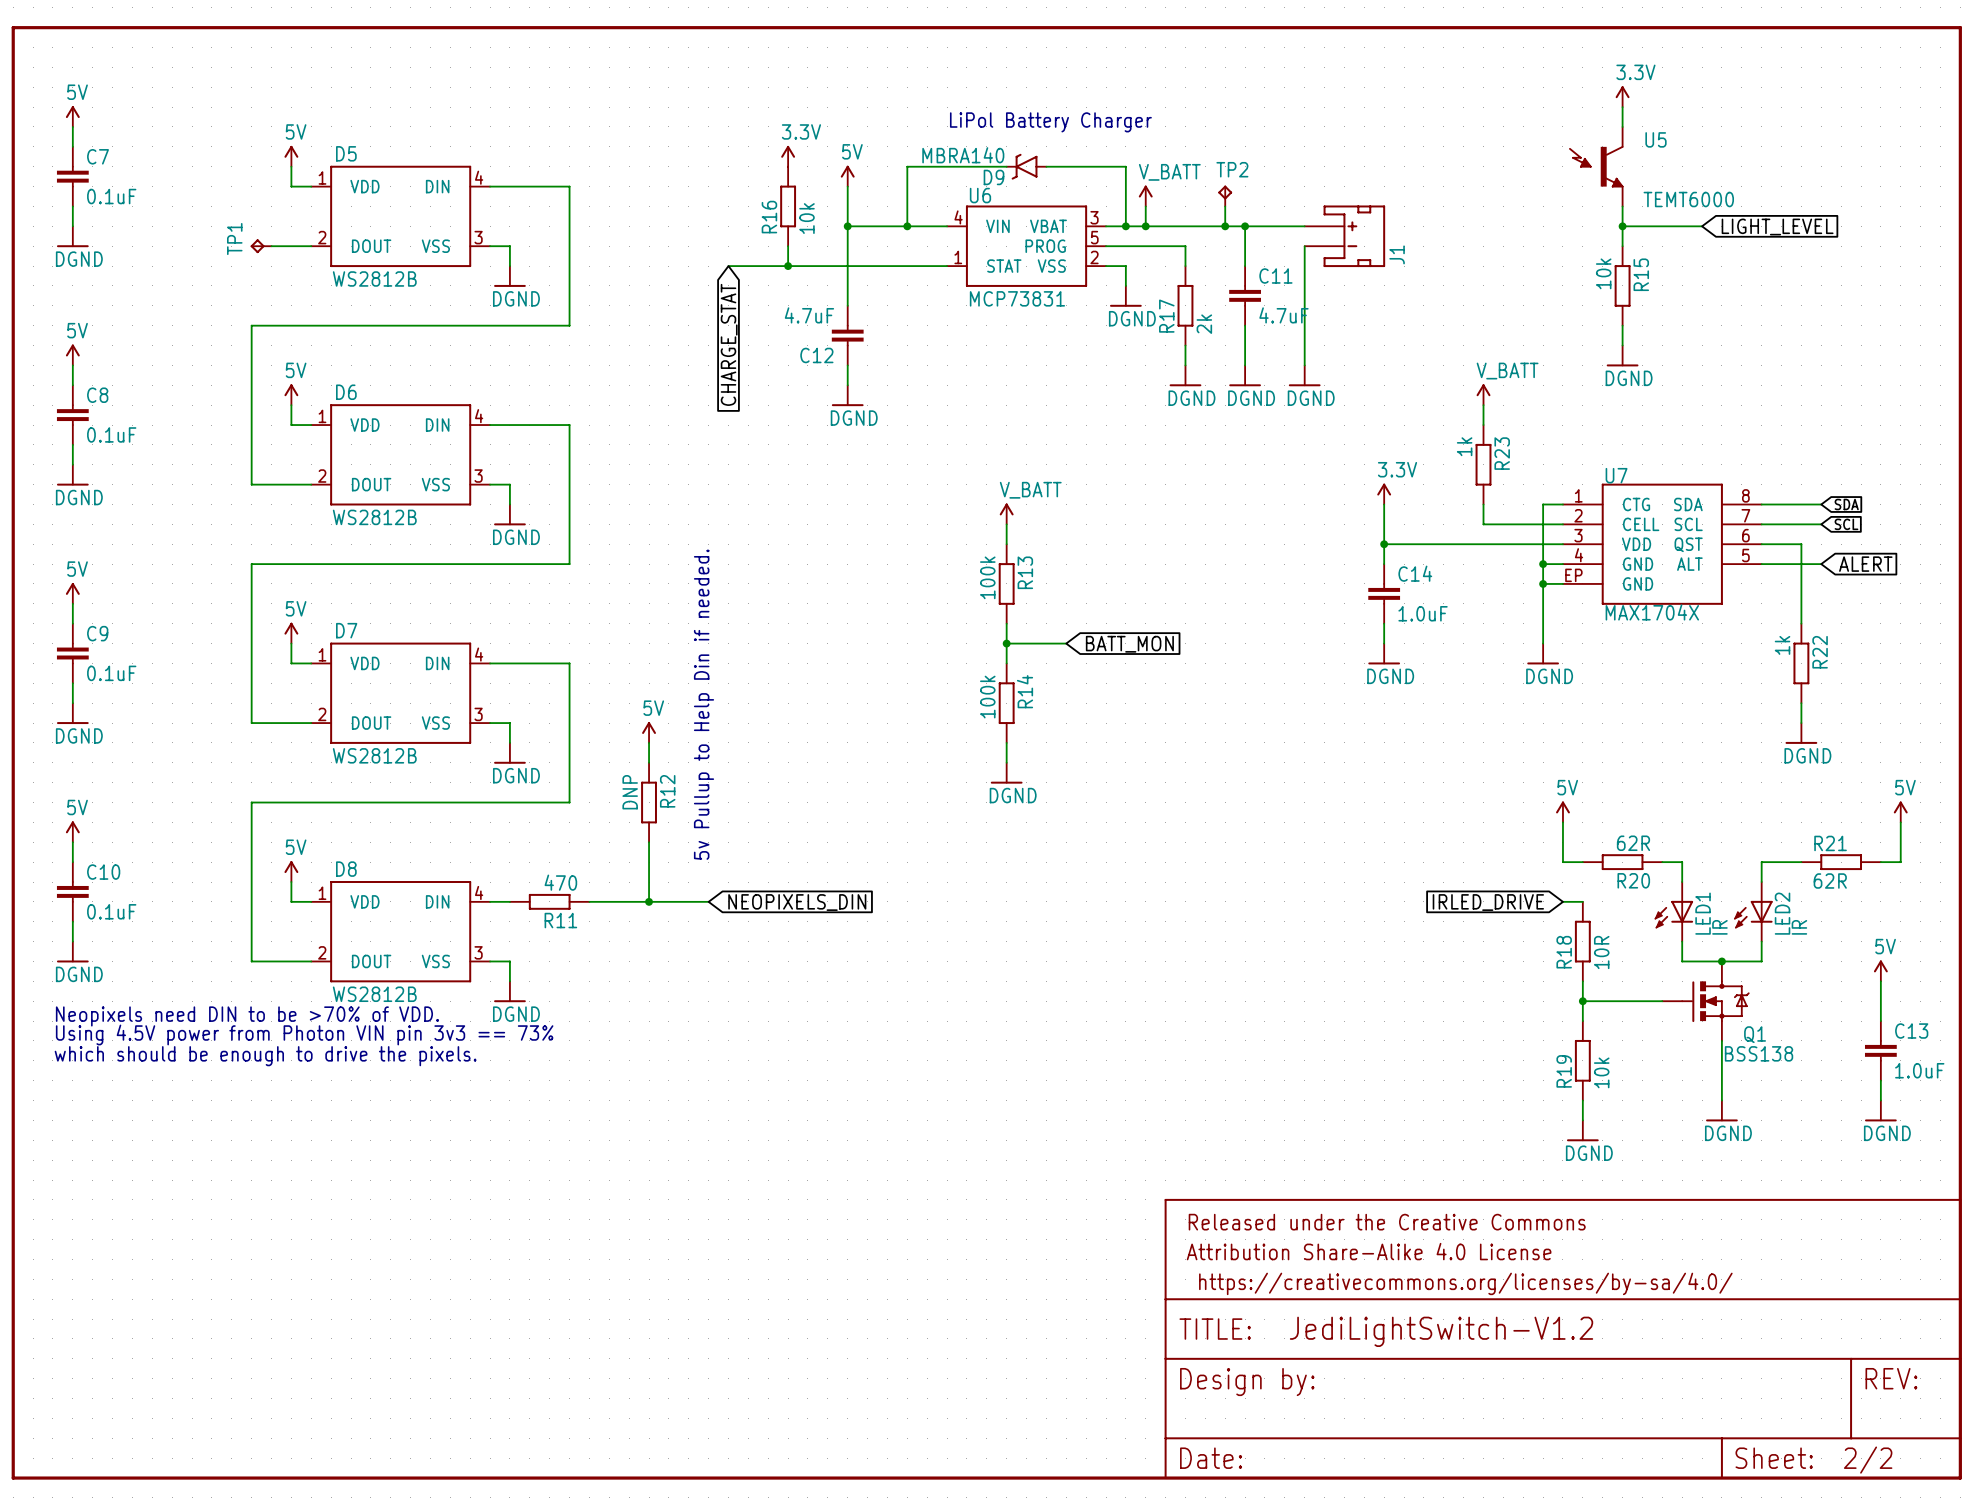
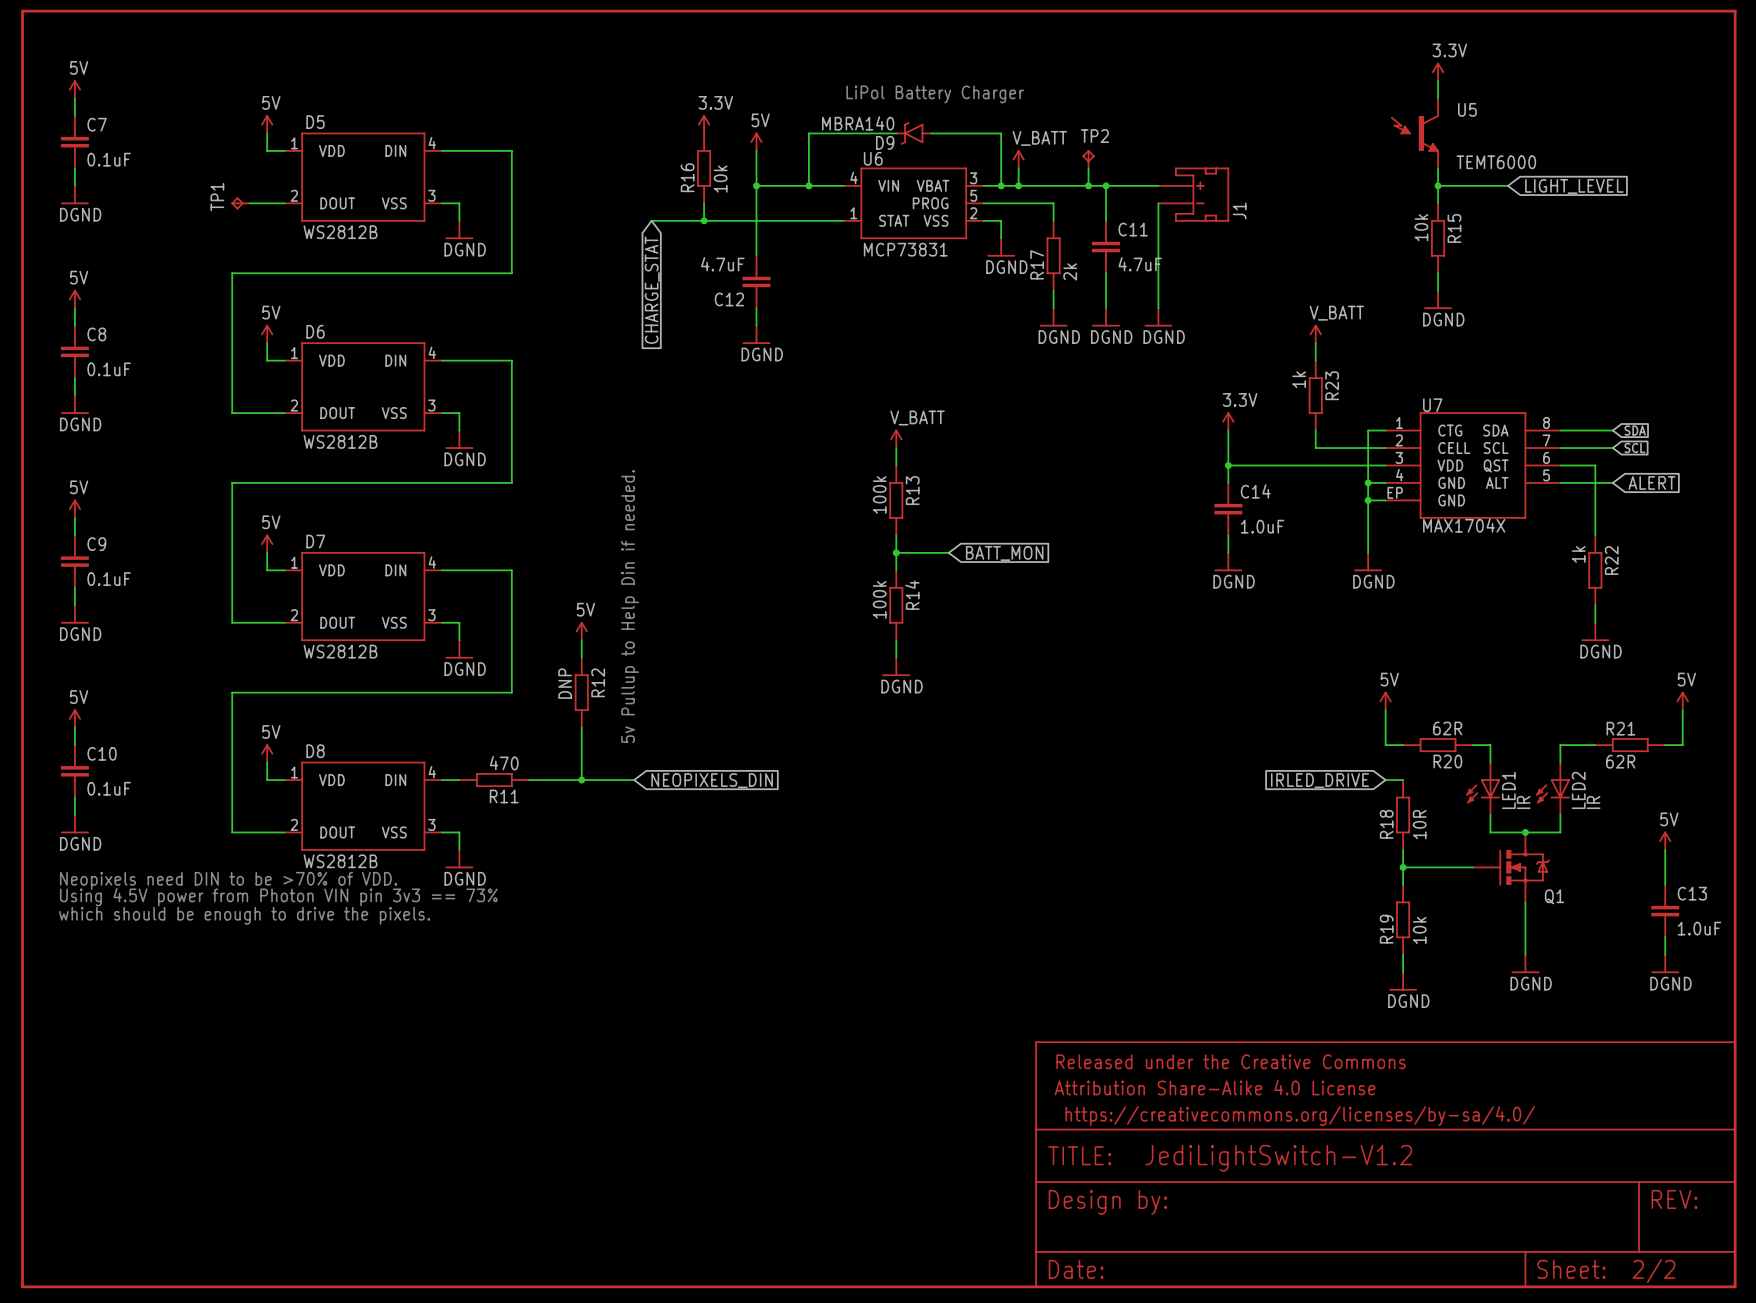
Q1 value: BSS138 (1759, 1053) -> none

